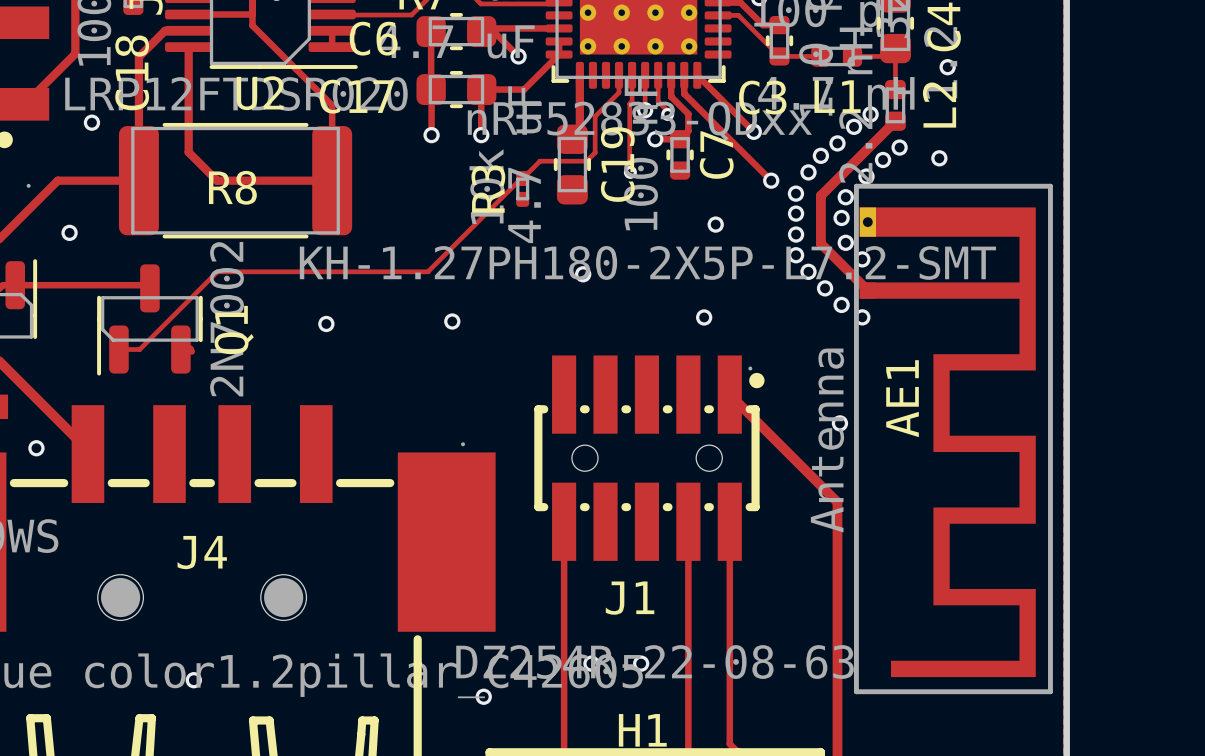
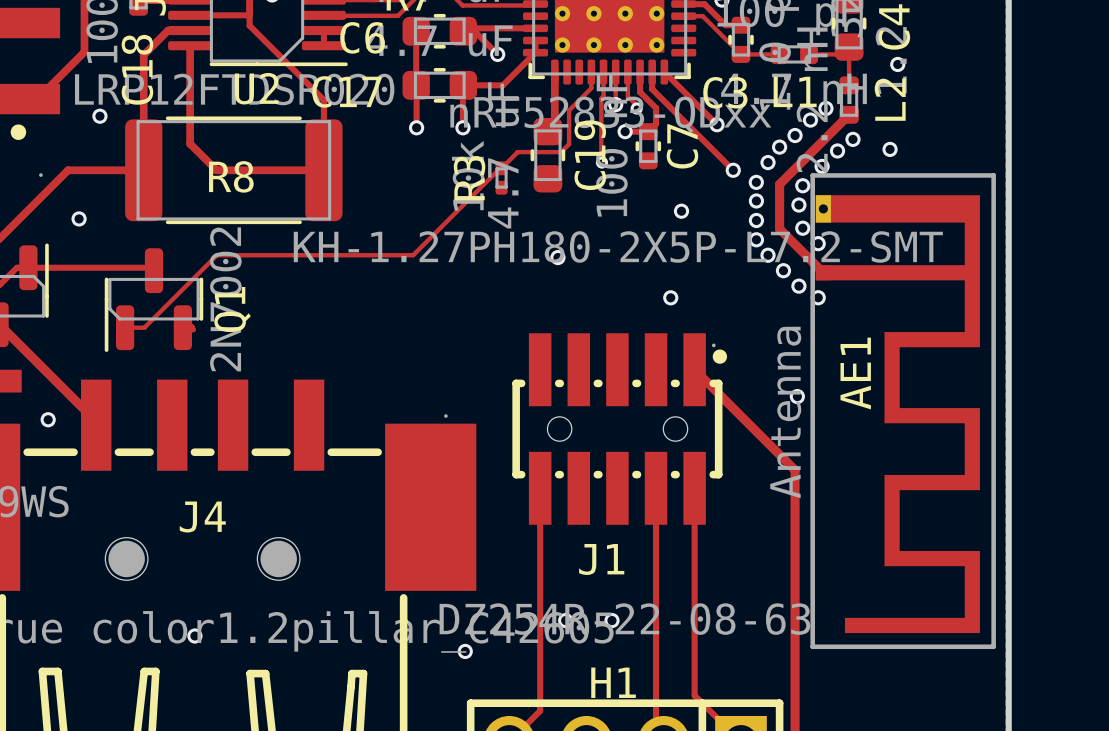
via: (452, 321) -> none
via: (326, 323) -> none

